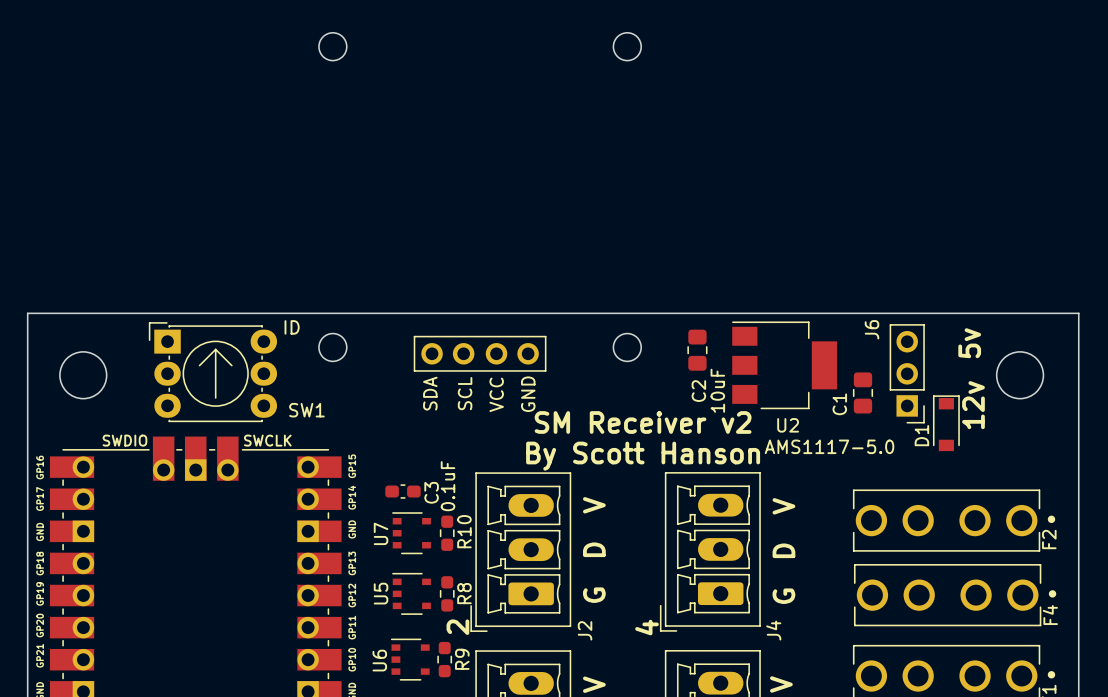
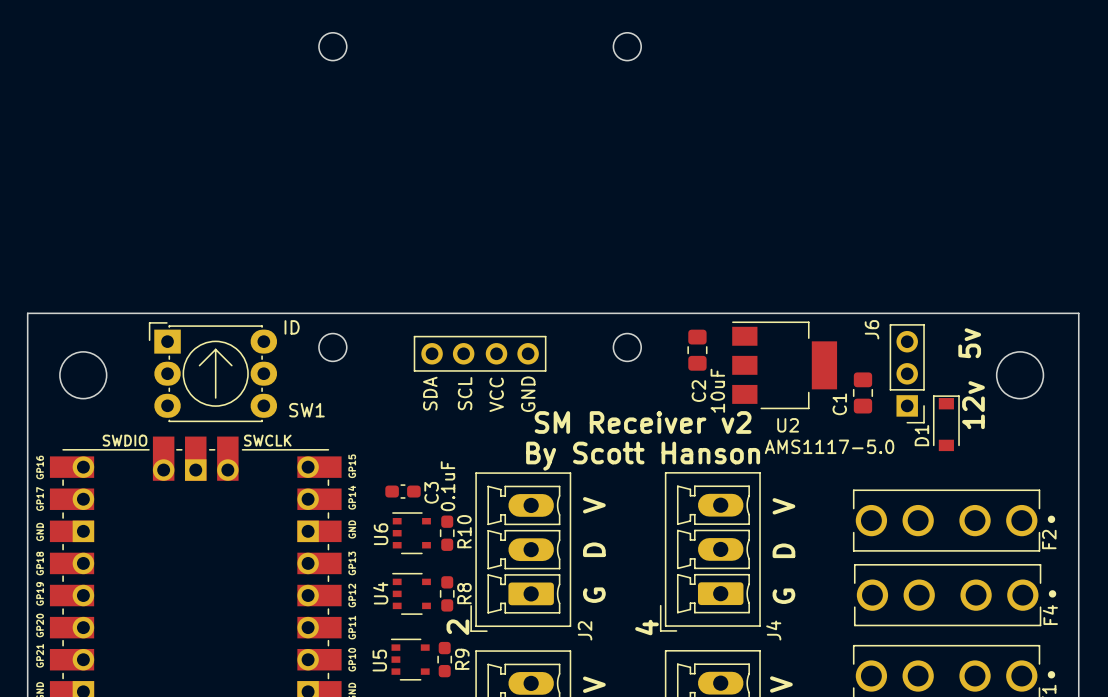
U7 name: U7 (381, 533) -> U6 (381, 534)
U5 name: U5 (381, 593) -> U4 (380, 593)
U6 name: U6 (379, 660) -> U5 (379, 660)

